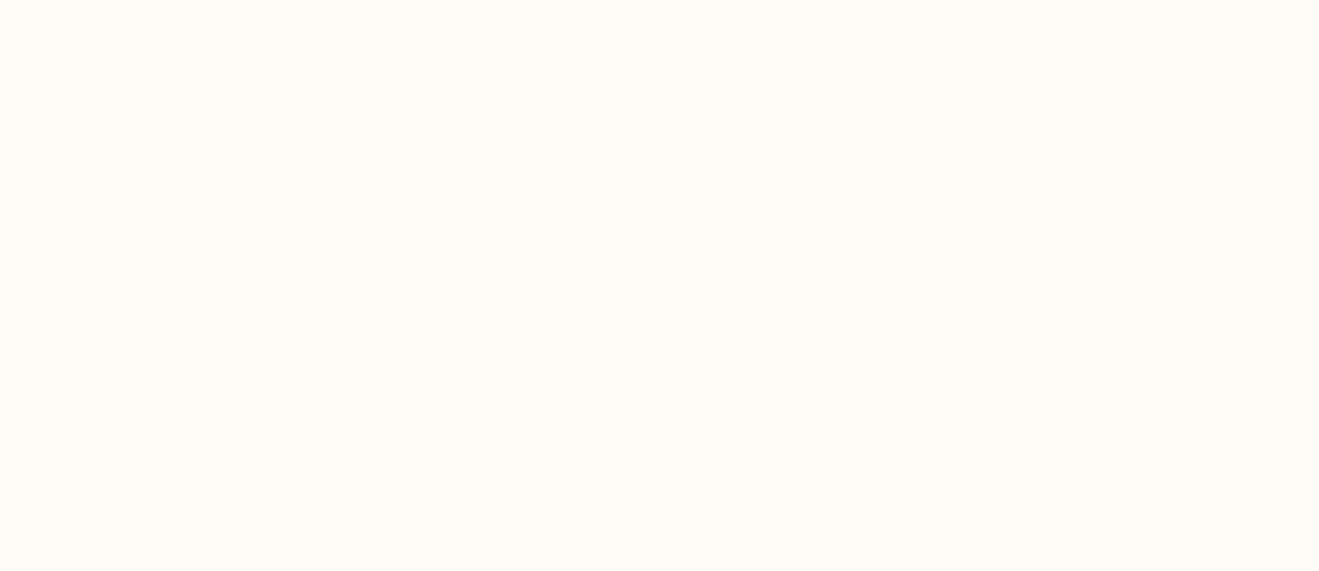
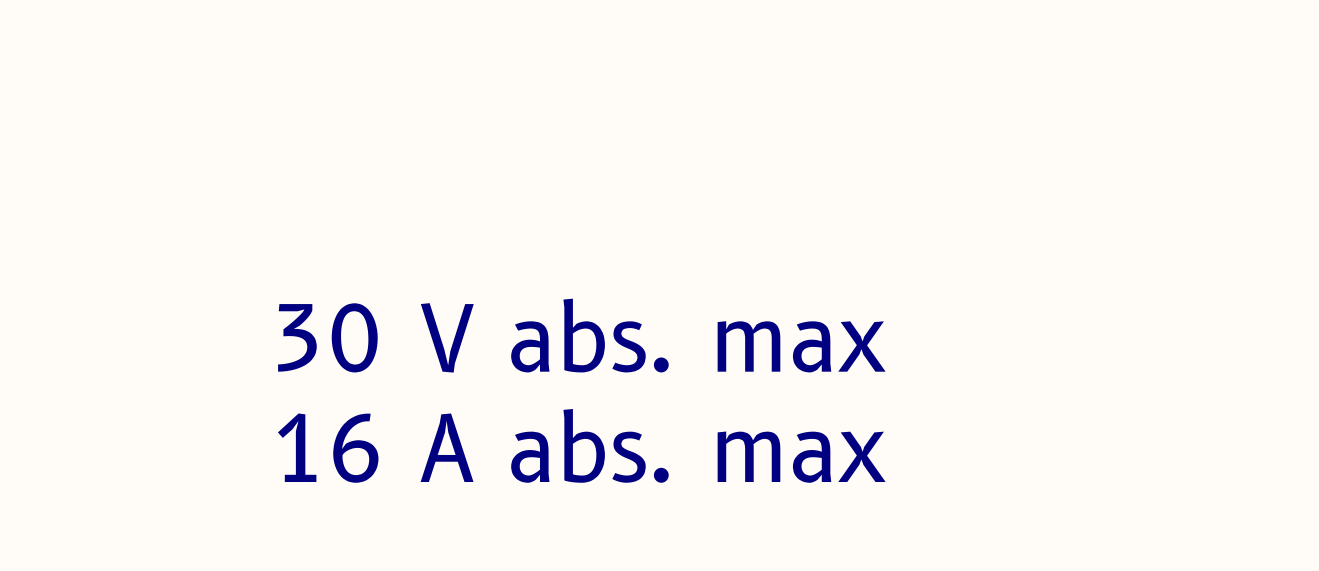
text: none -> 30 V abs. max (581, 335)
text: none -> 16 A abs. max (581, 445)

